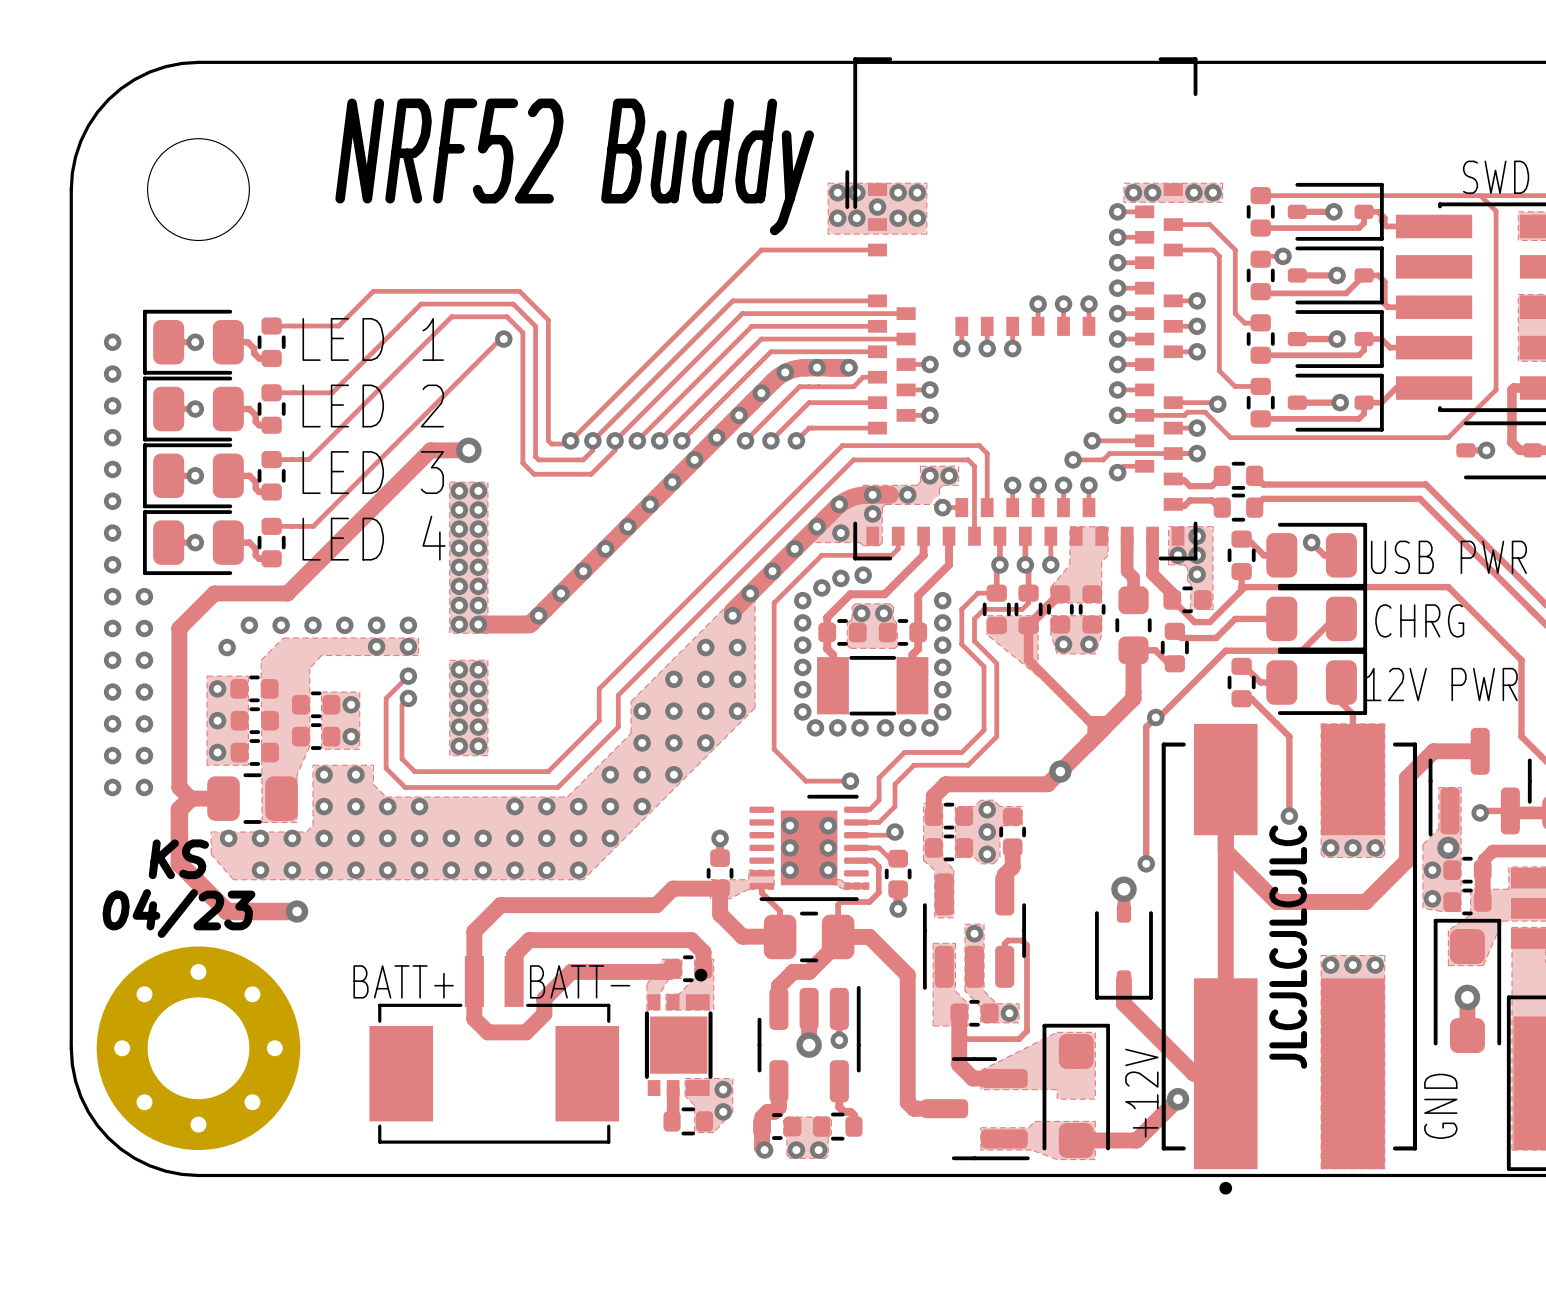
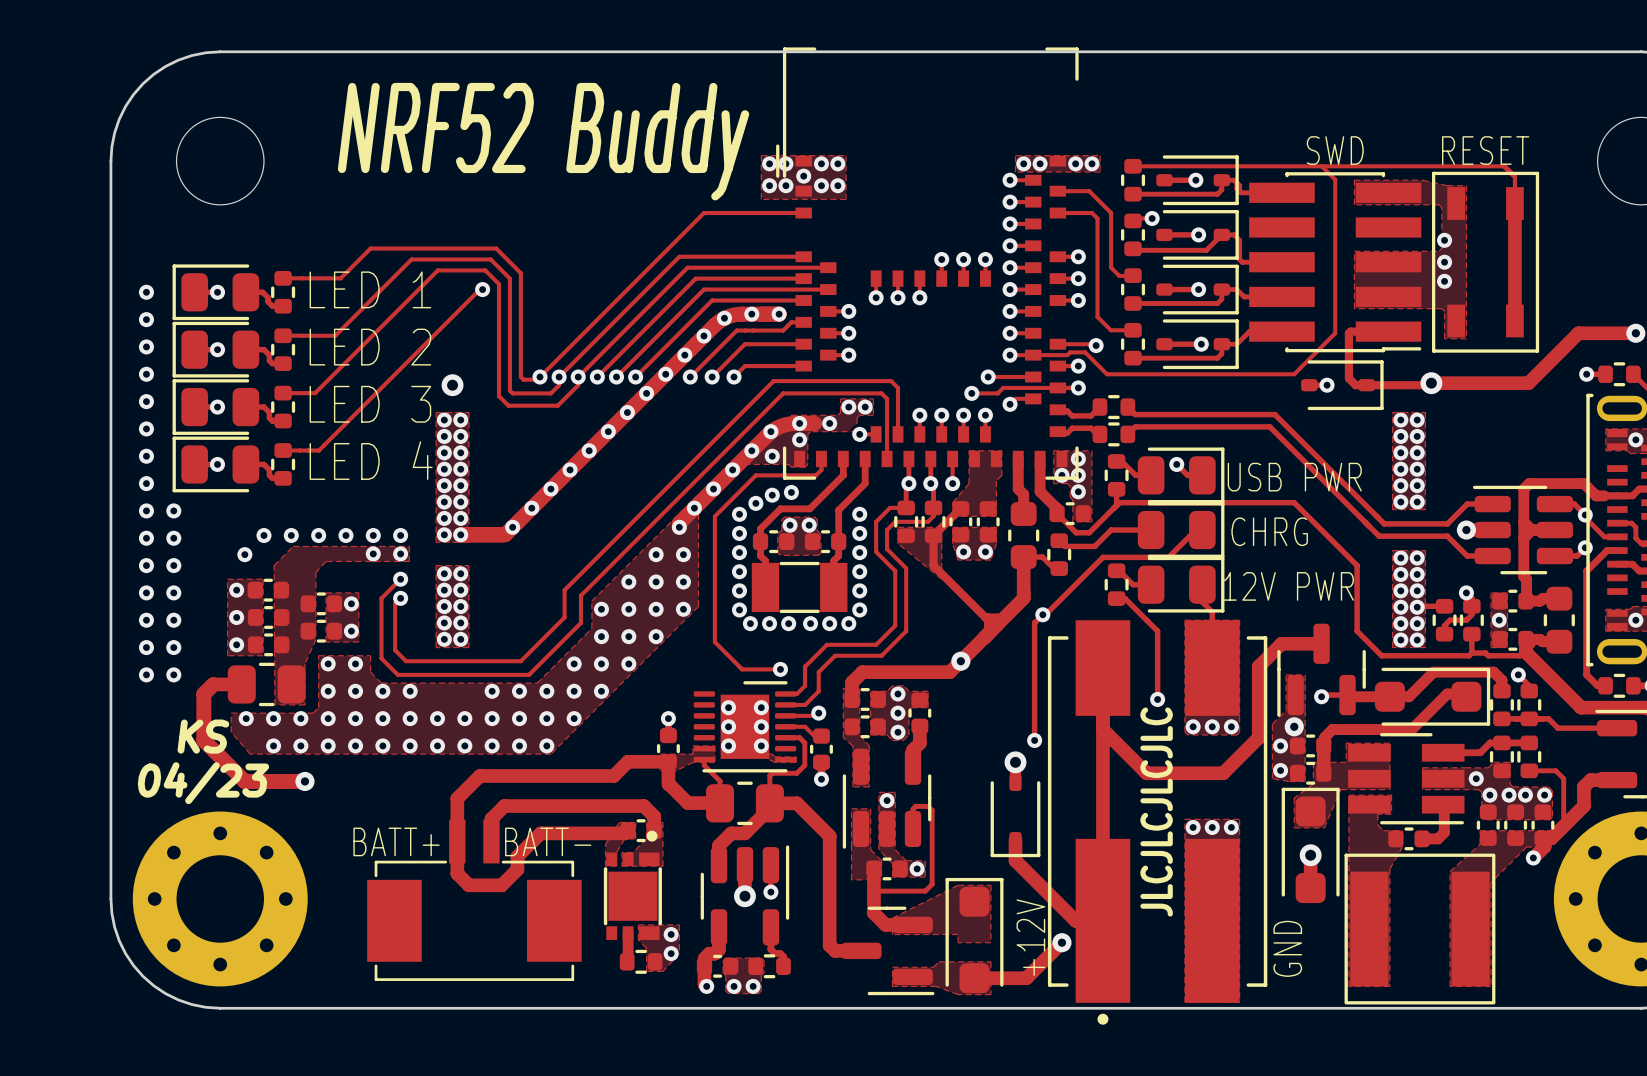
track: (468, 450) (430, 450) (287, 593) (214, 593) (179, 628) (179, 787) (190, 798) -> none

